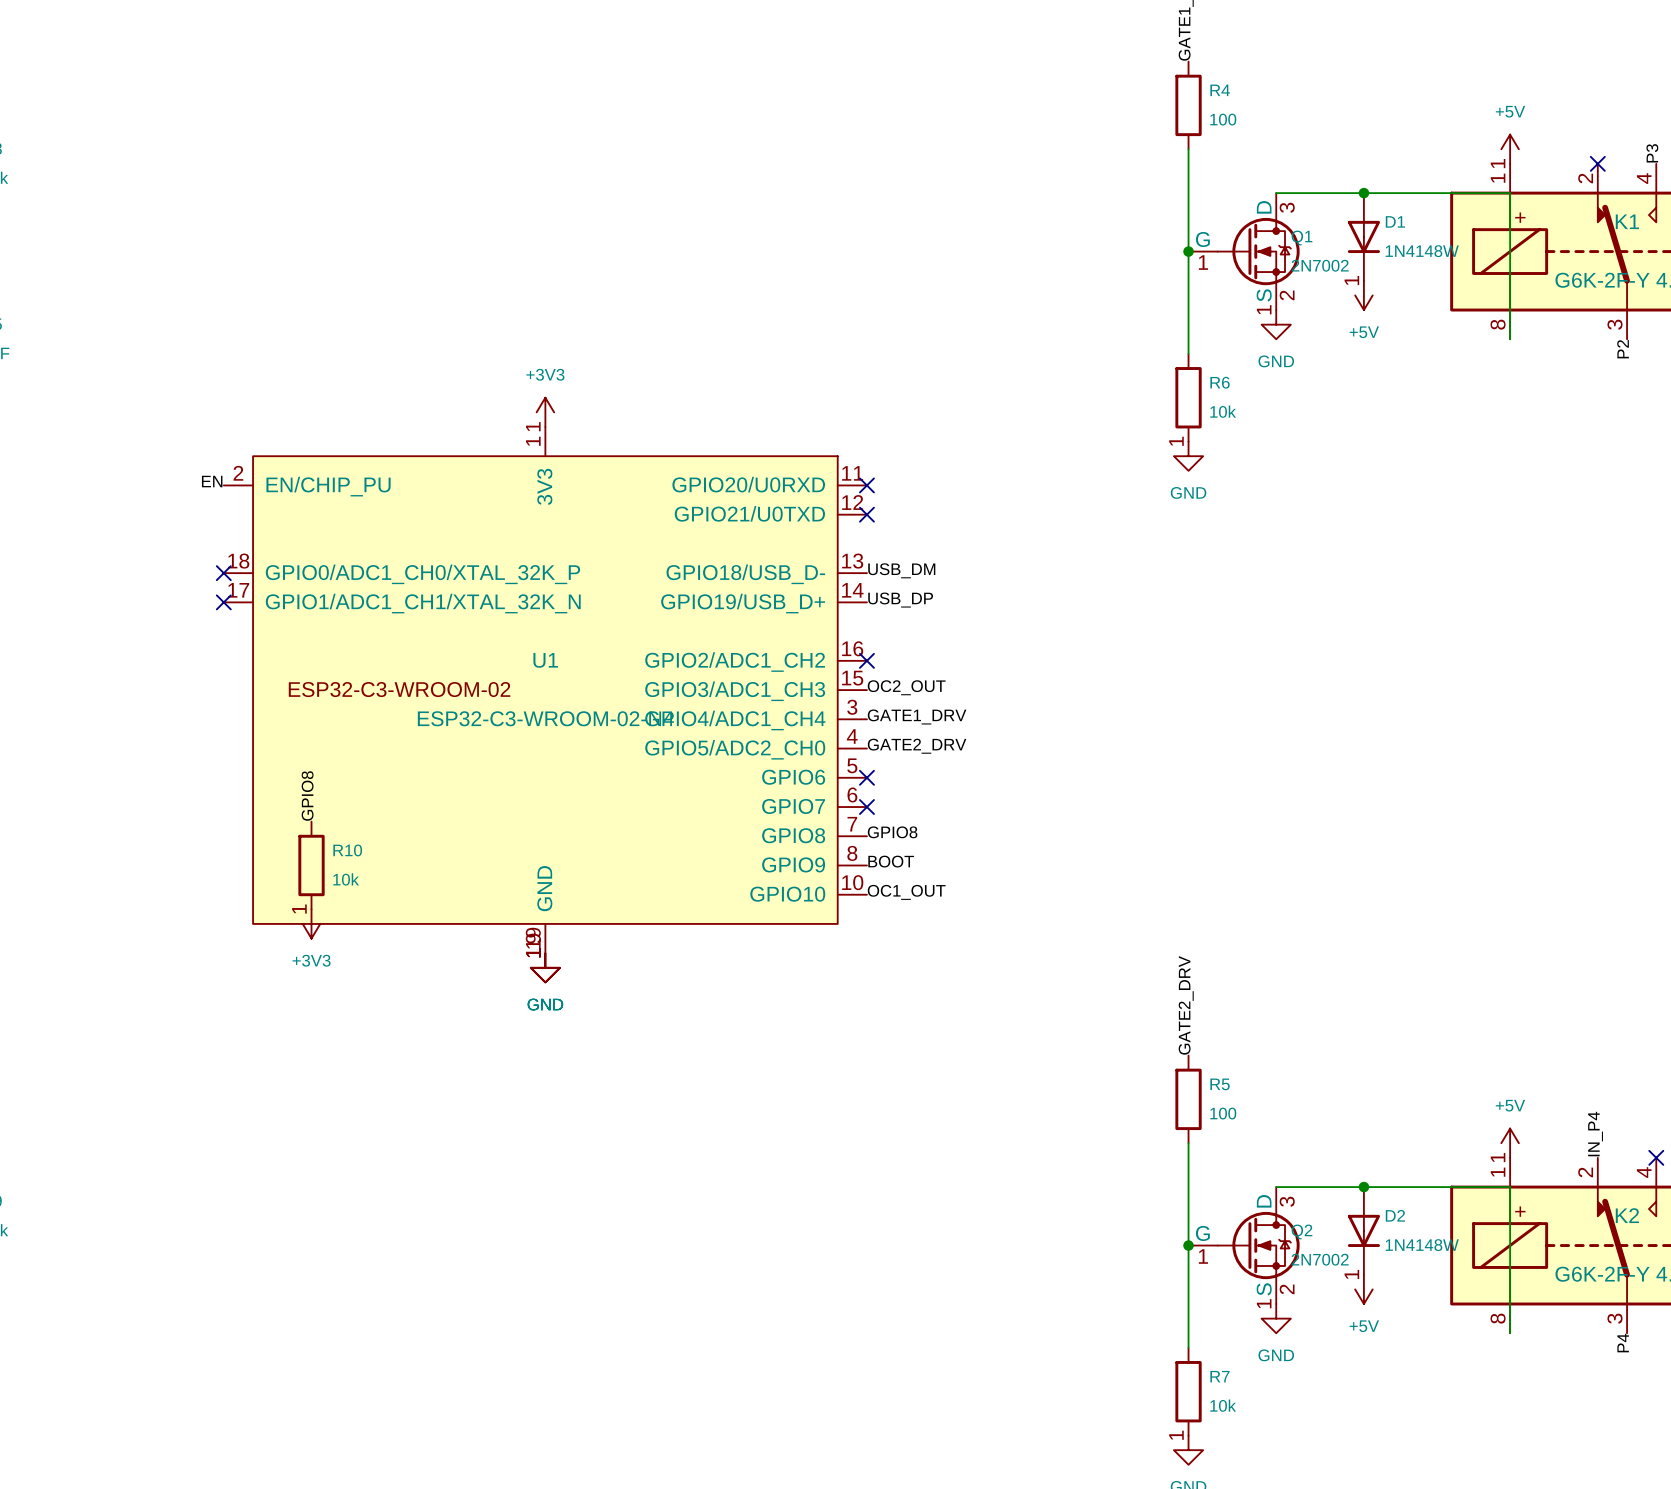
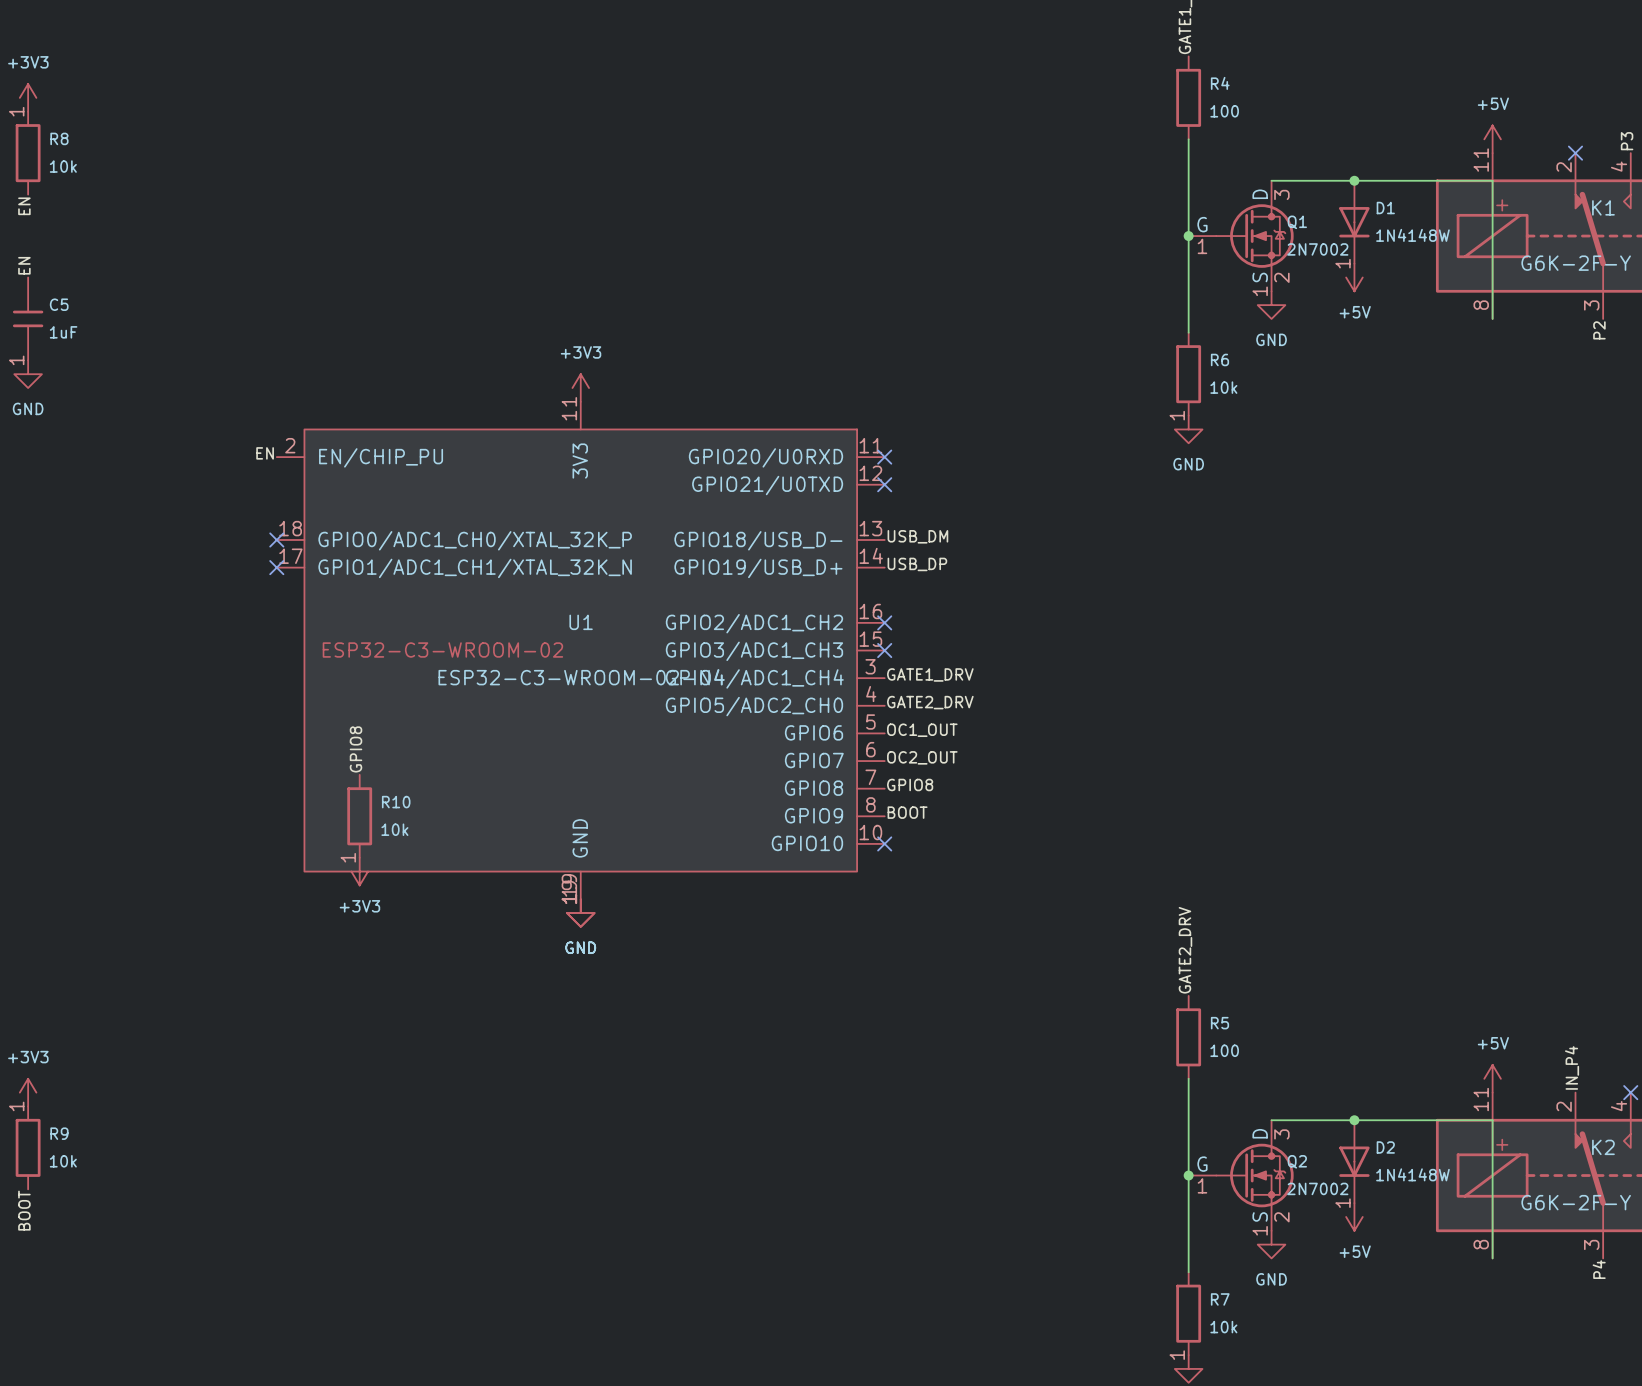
label position: OC2_OUT (906, 687) -> OC2_OUT (922, 757)
no-connect mark: none -> (884, 650)
no-connect mark: (866, 777) -> none
no-connect mark: (866, 807) -> none
label position: OC1_OUT (906, 892) -> OC1_OUT (922, 730)
no-connect mark: none -> (884, 843)

